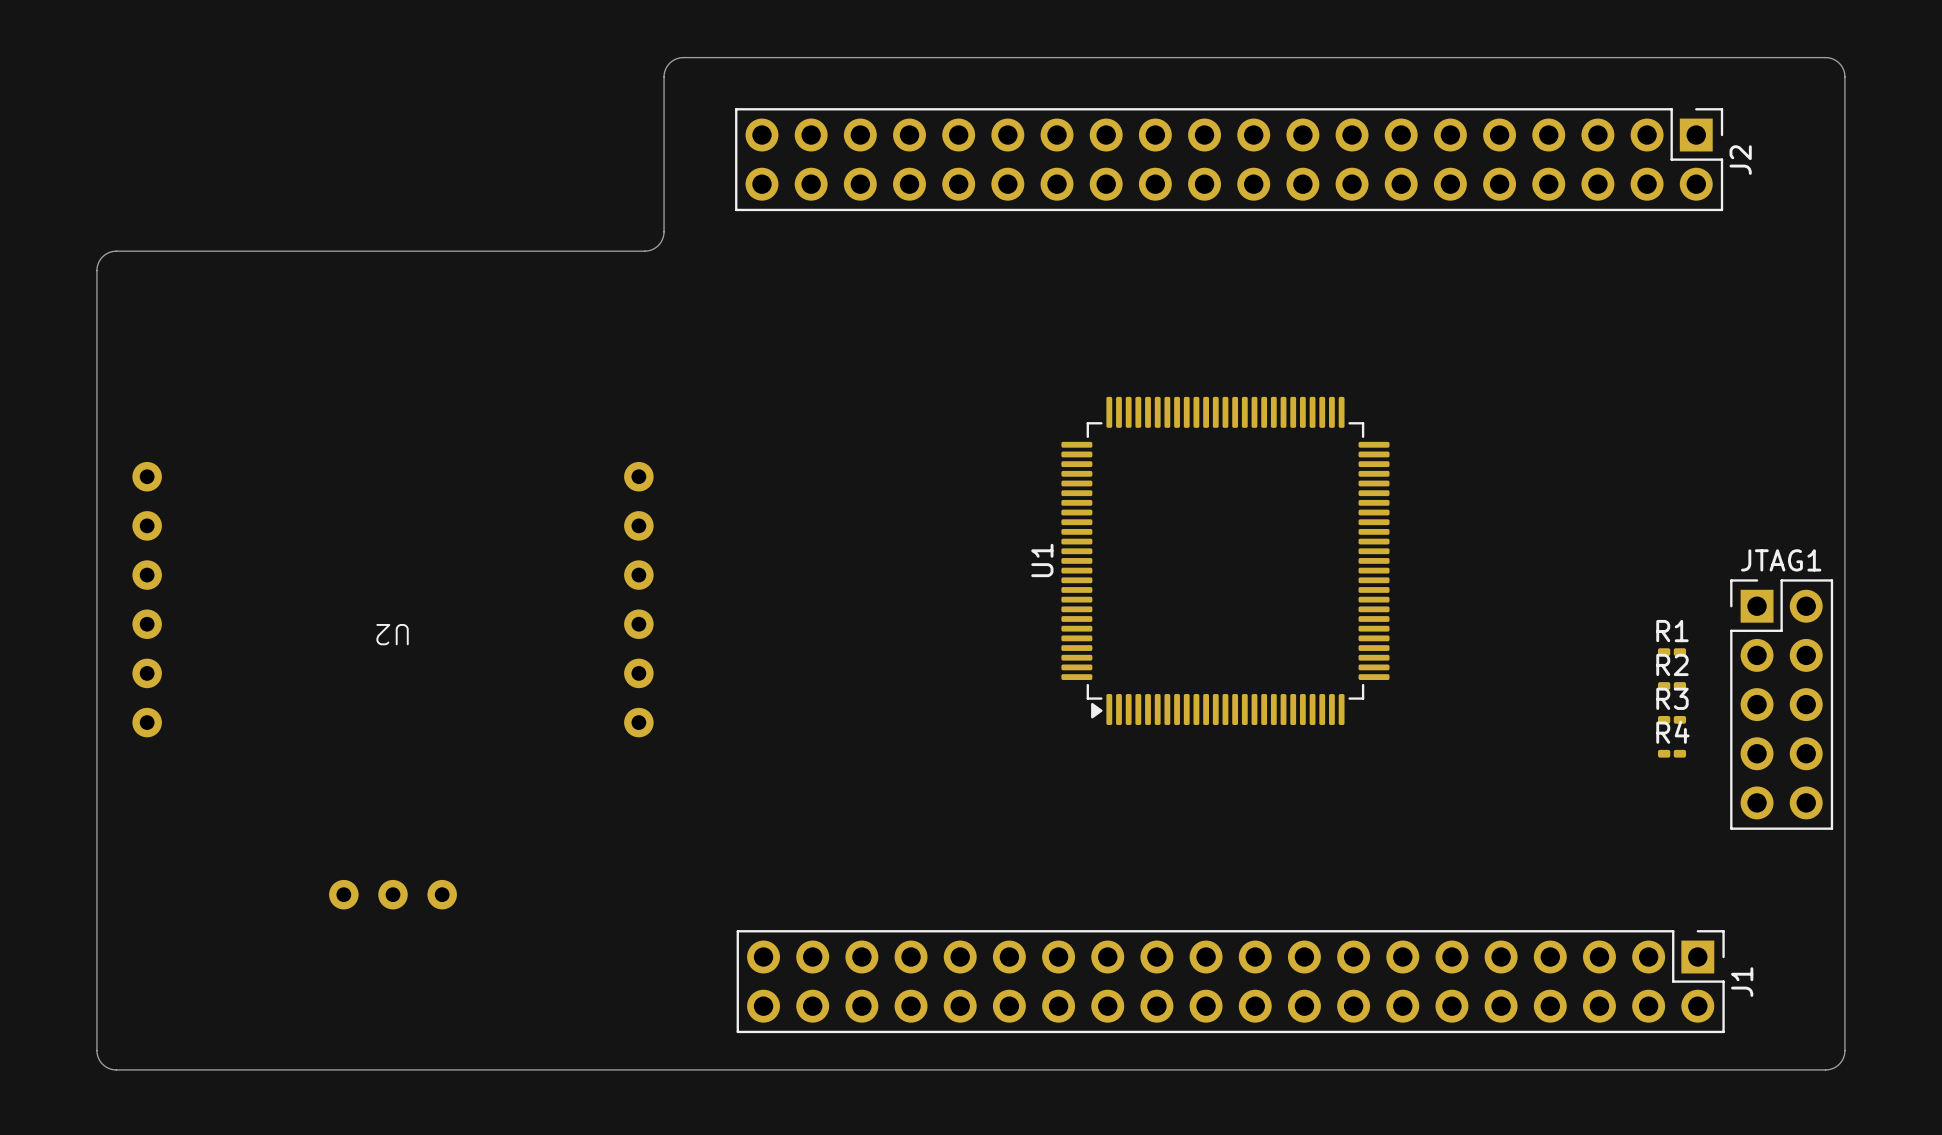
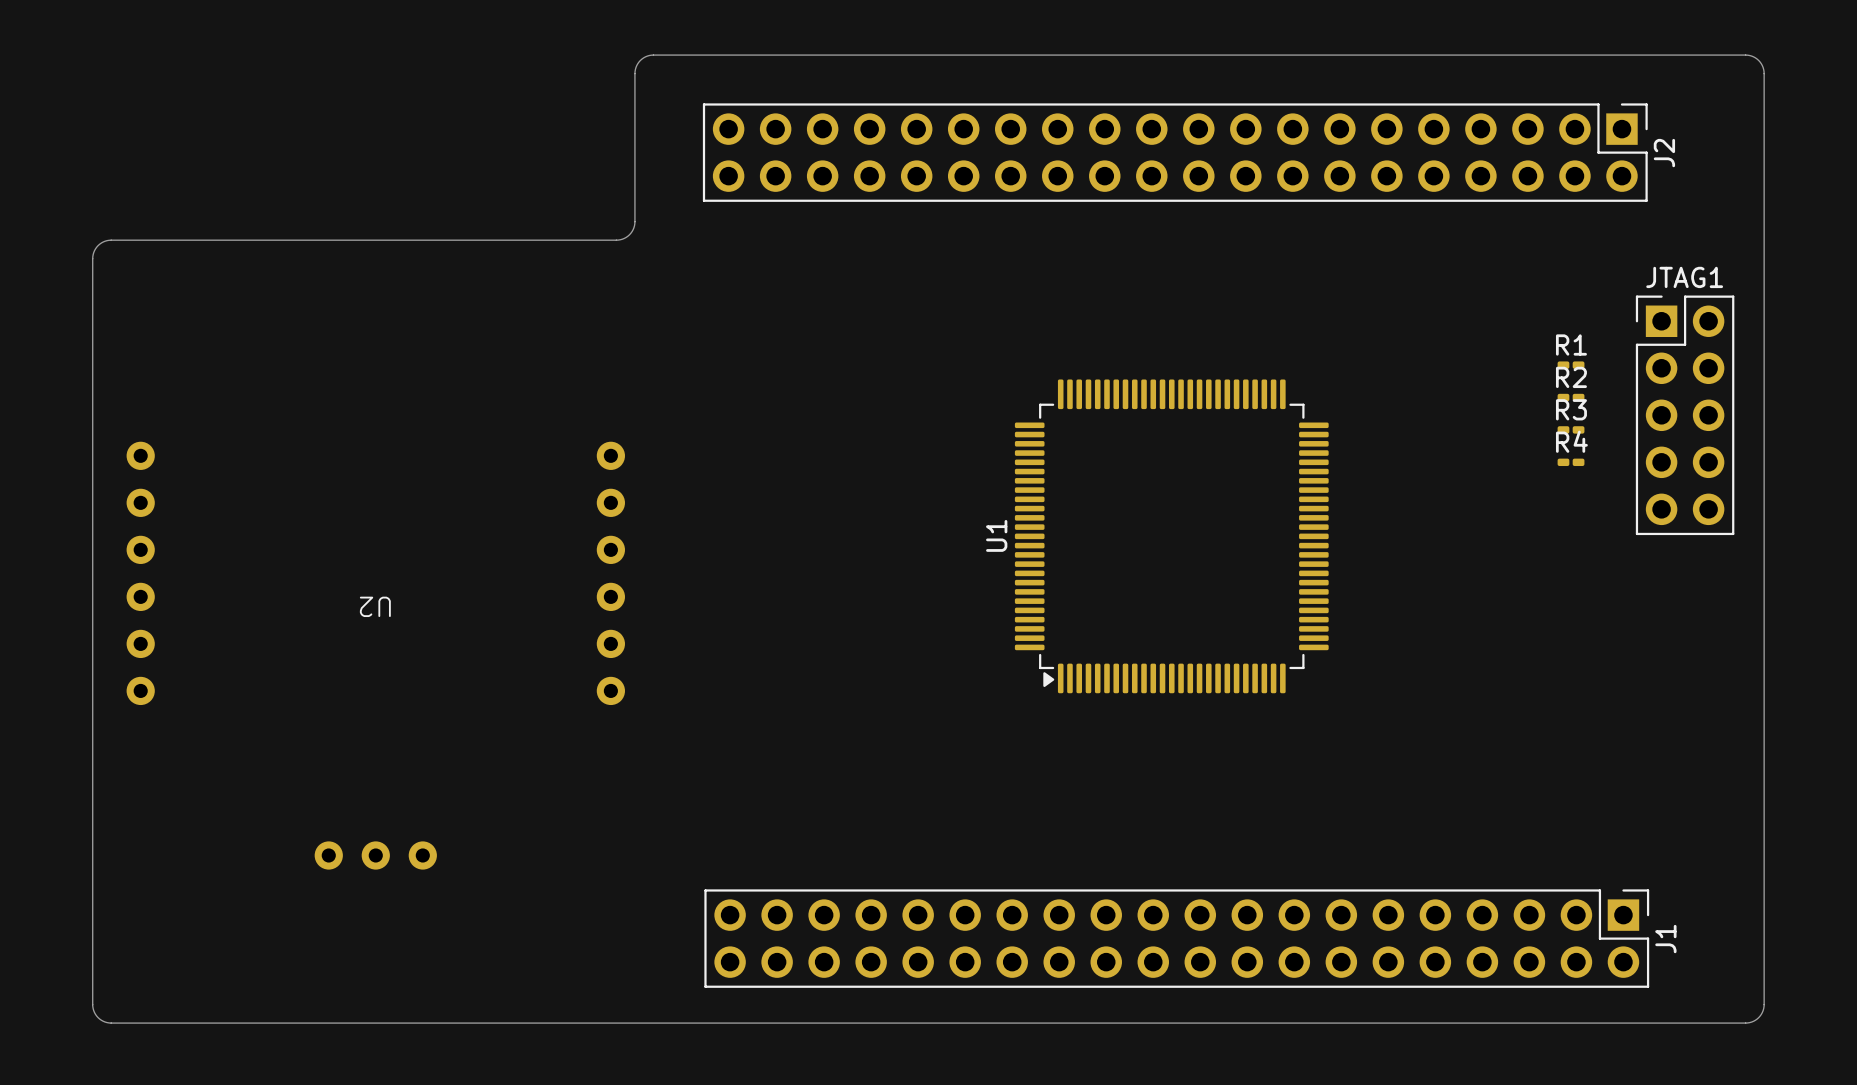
R1 position: (1672, 652) -> (1571, 365)
R2 position: (1672, 685) -> (1571, 397)
JTAG1 position: (1781, 704) -> (1685, 415)
R3 position: (1672, 719) -> (1571, 429)
R4 position: (1672, 753) -> (1571, 462)

